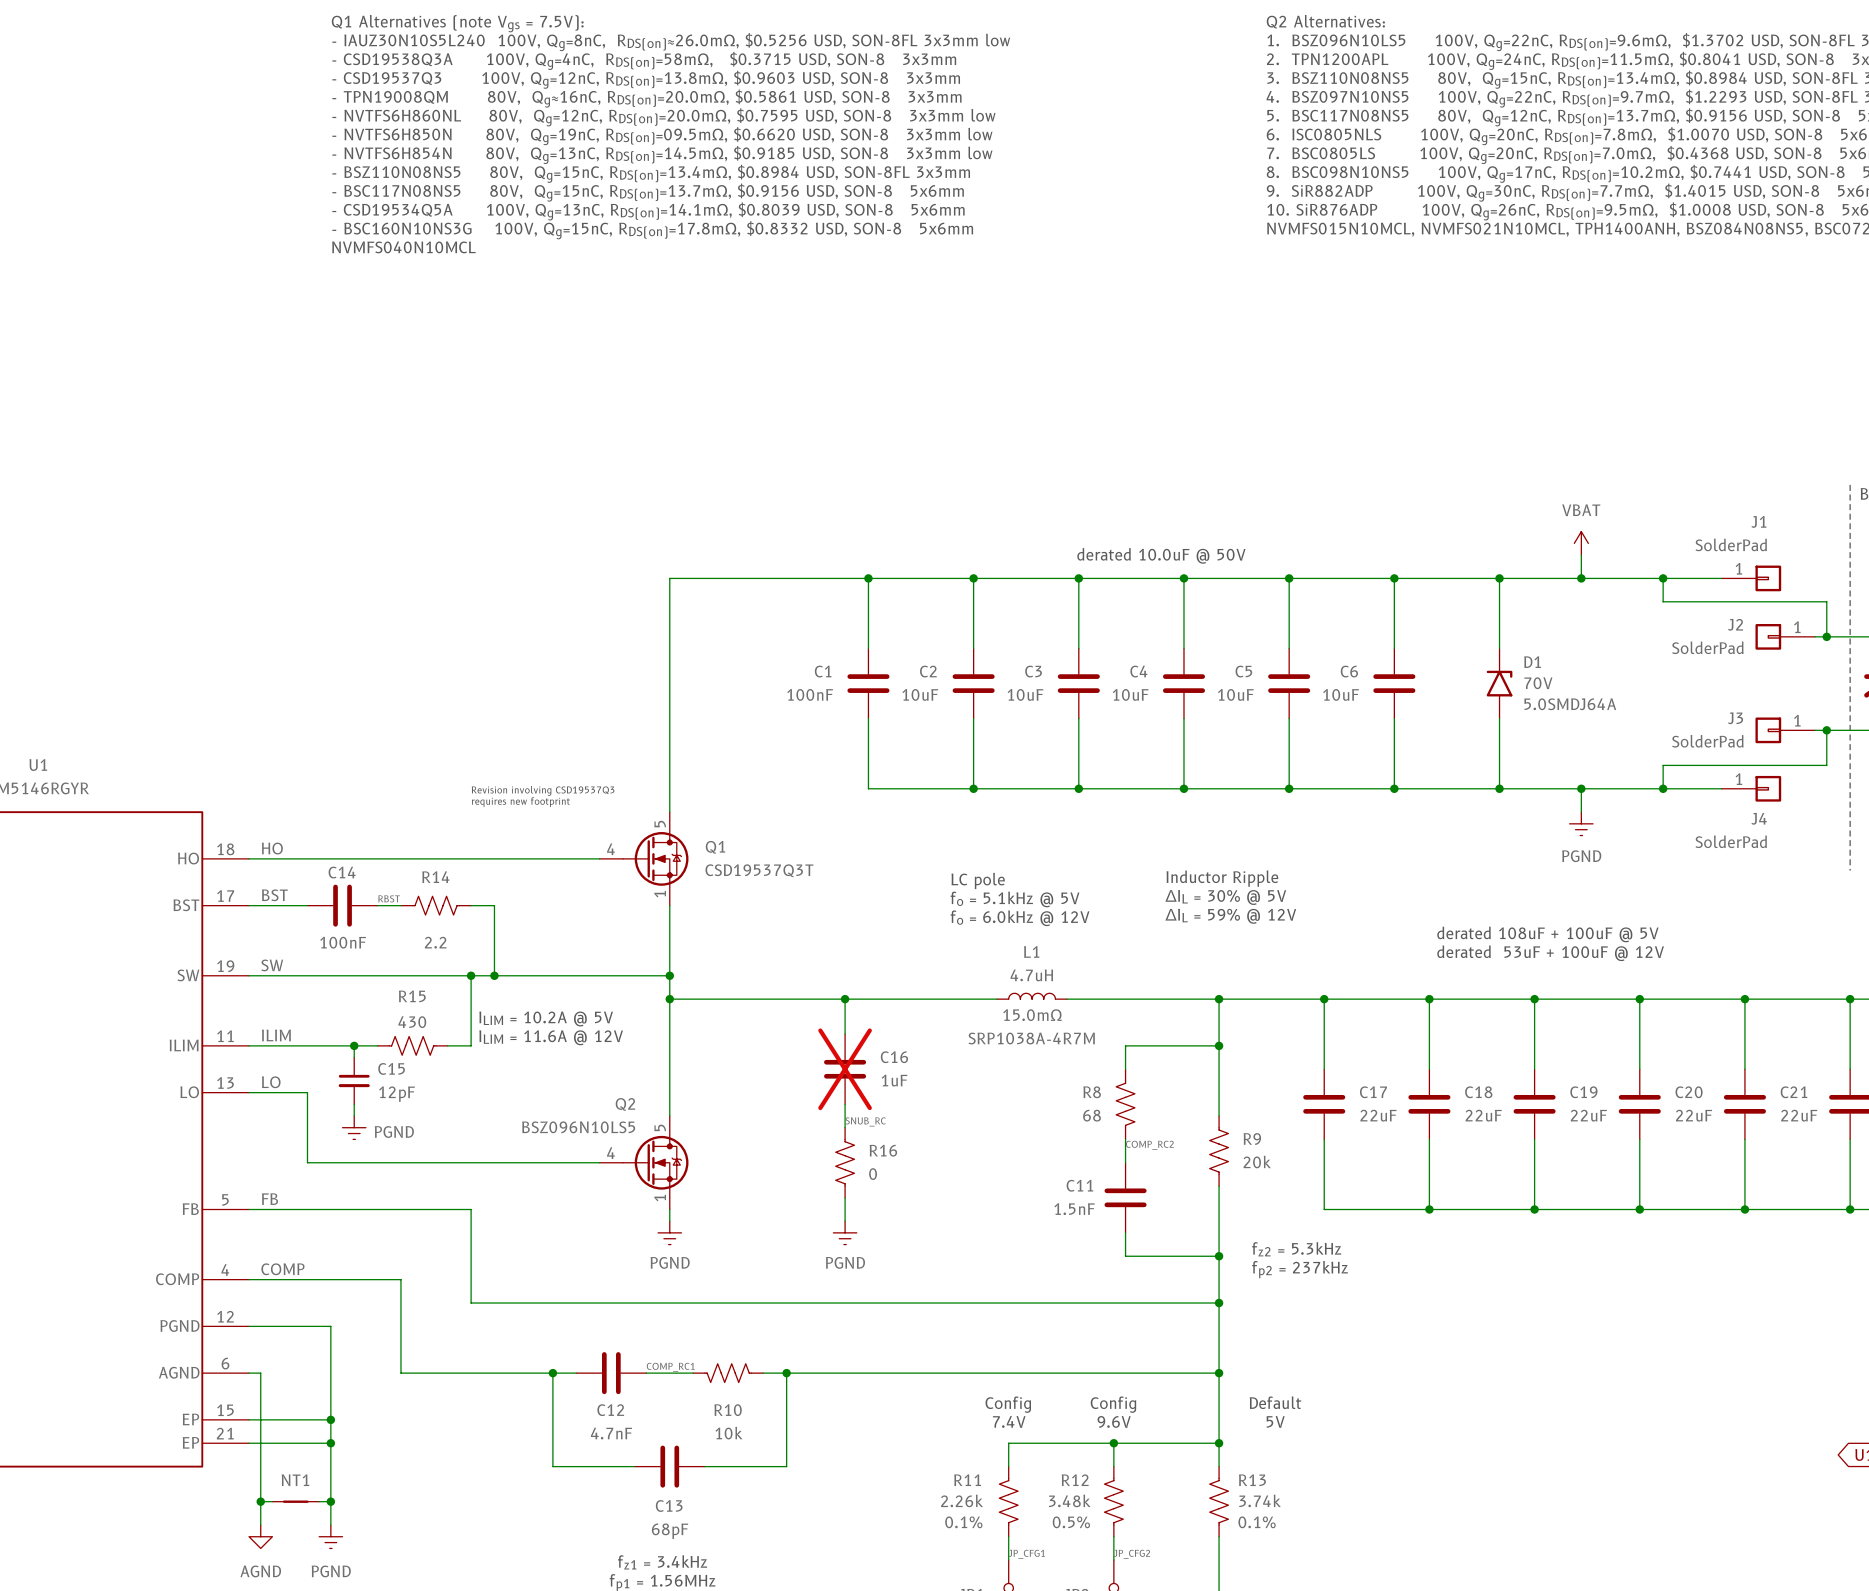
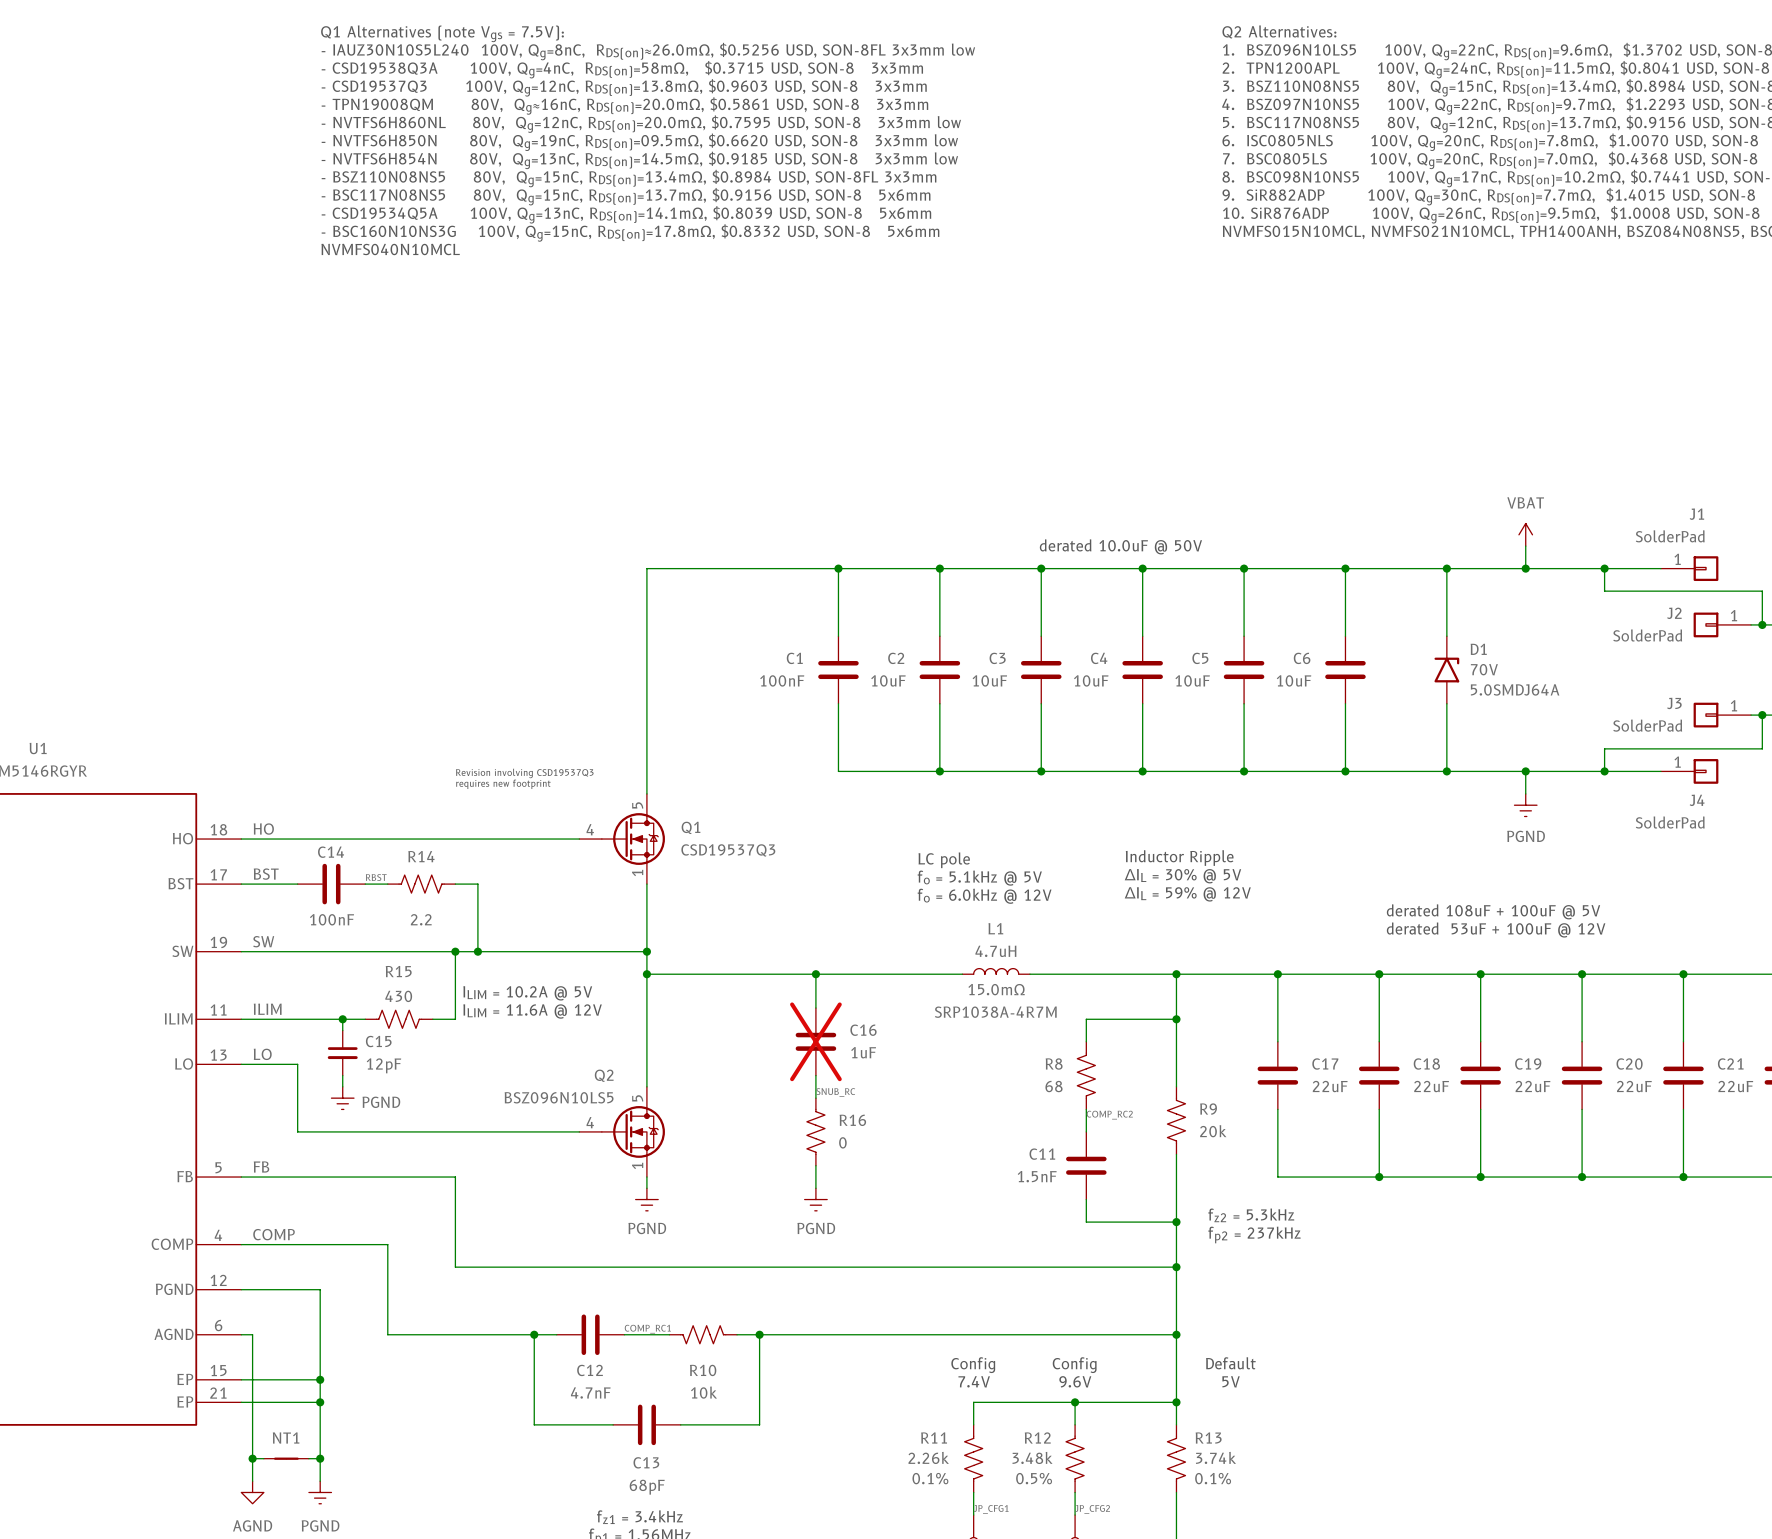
Q1 value: CSD19537Q3T (759, 870) -> CSD19537Q3 (728, 850)

